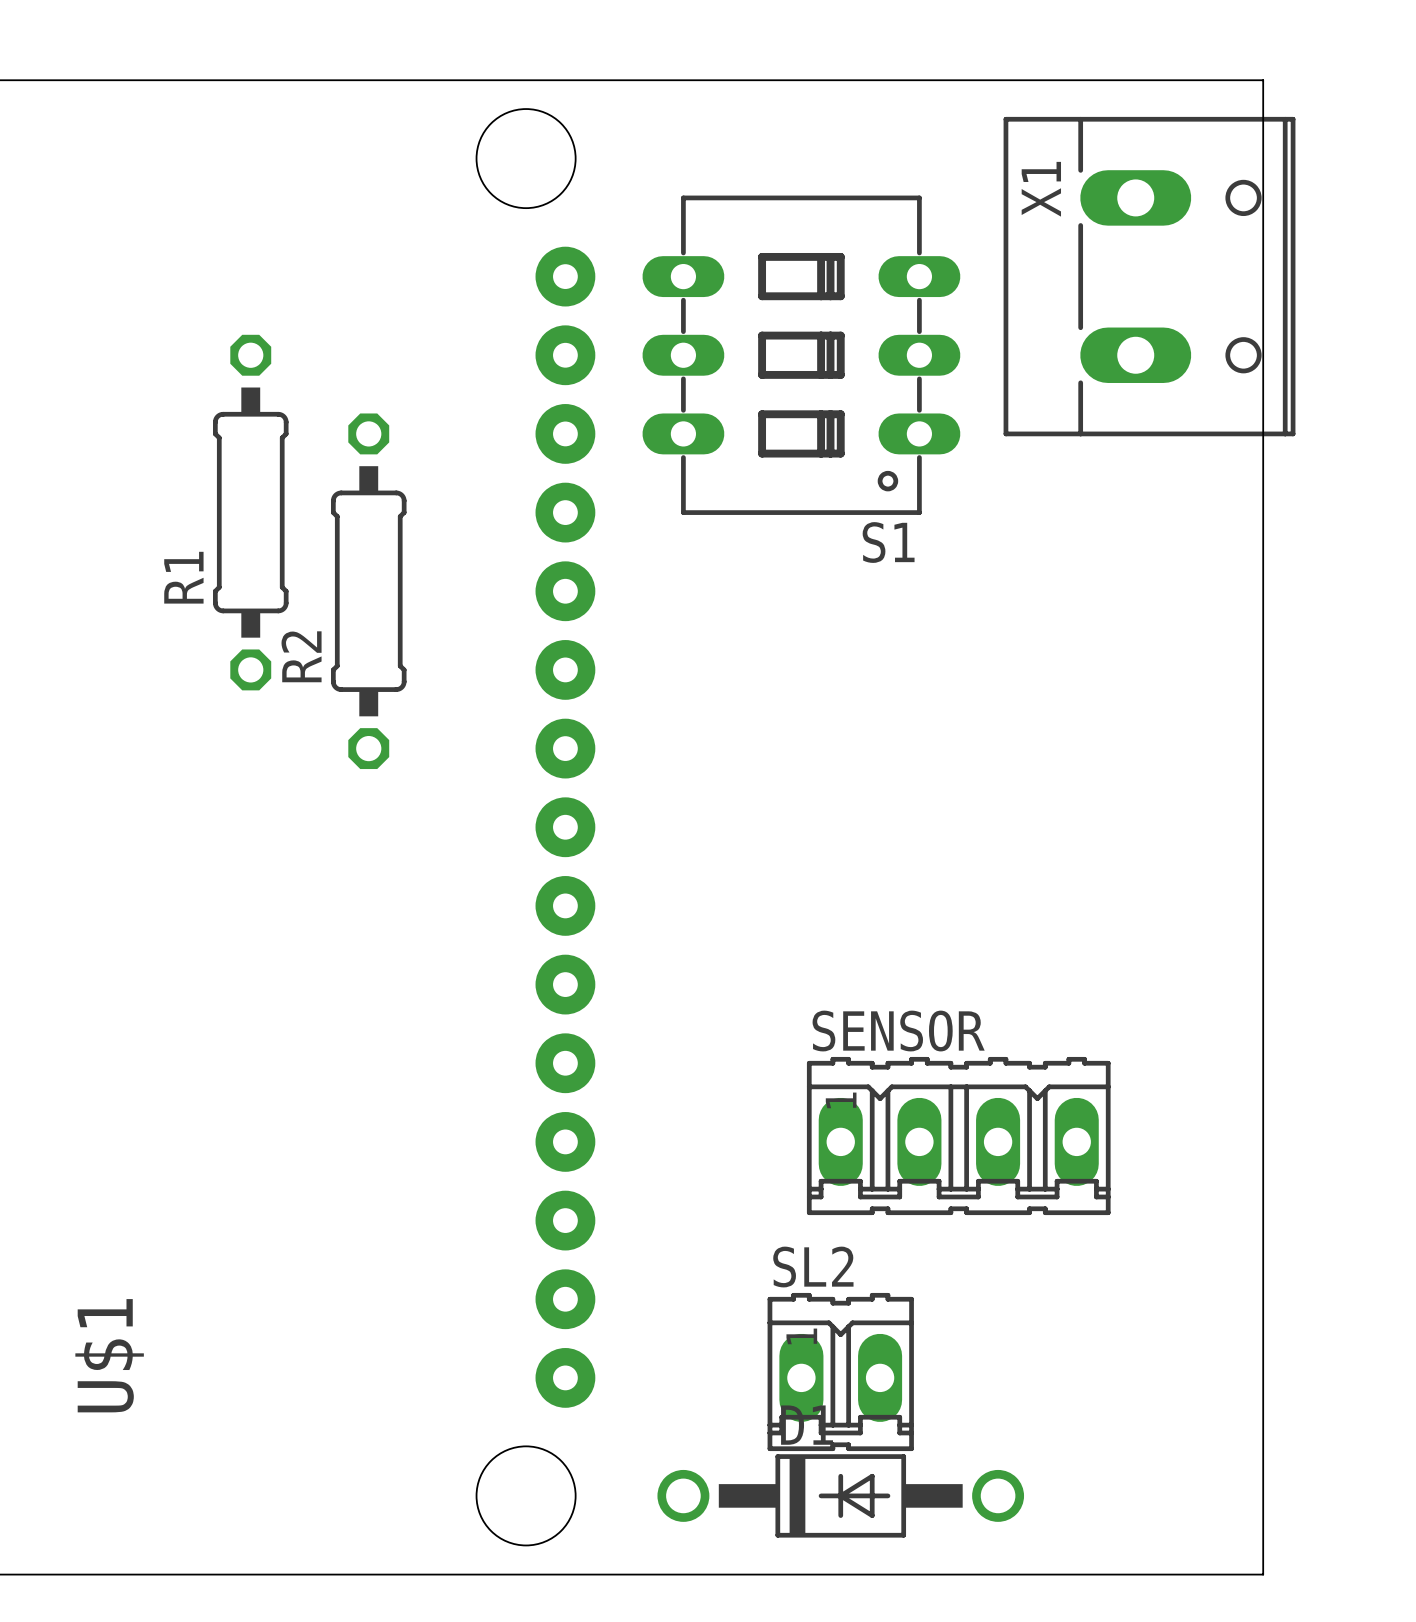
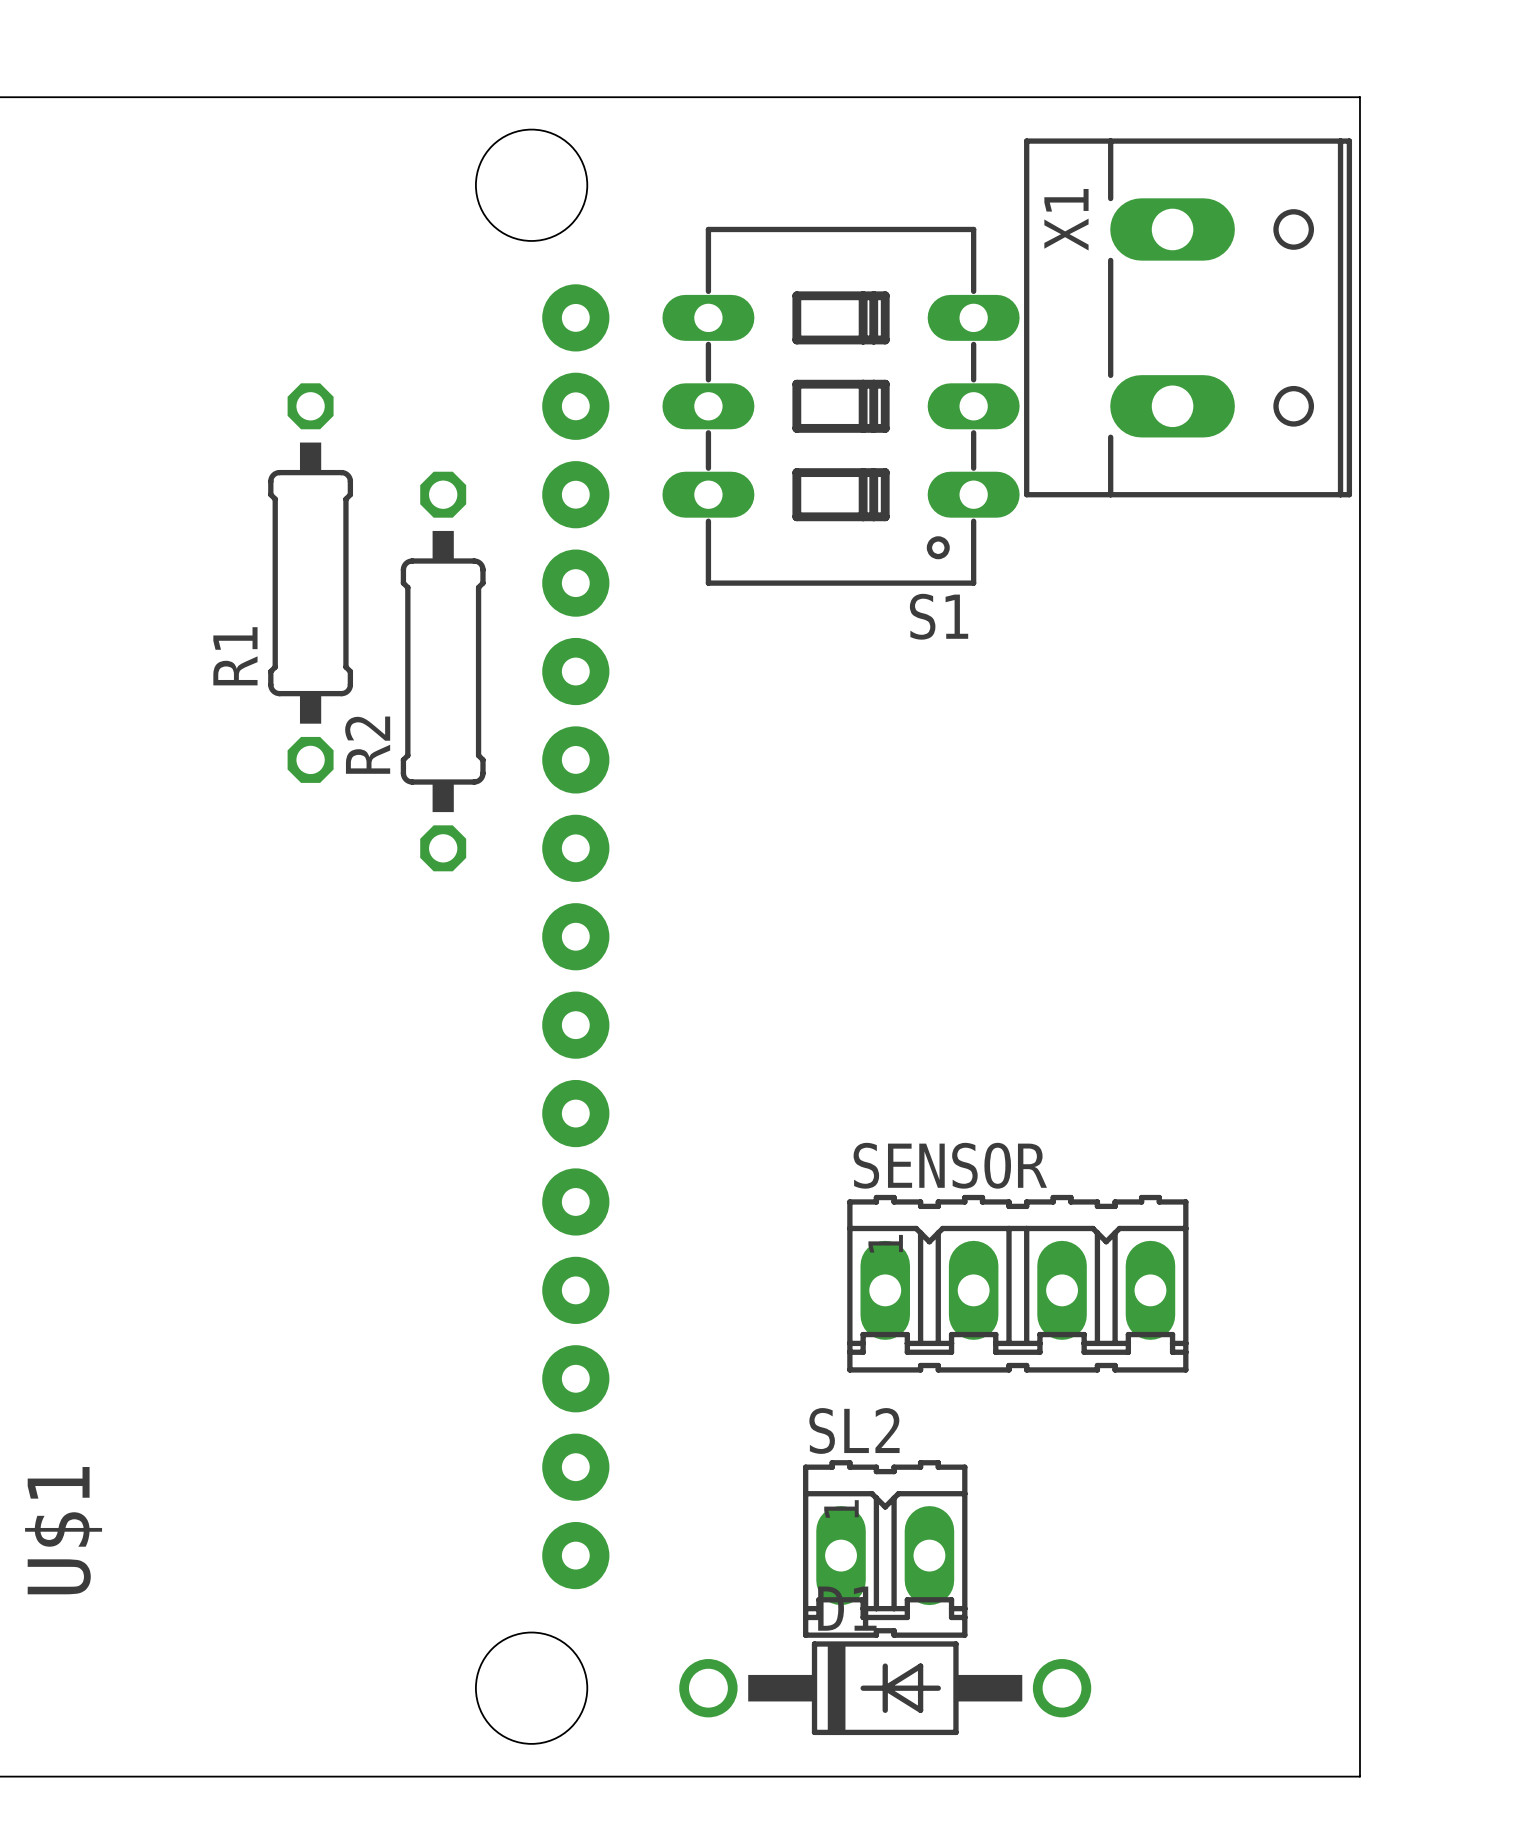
X1 position: (1149, 276) -> (1188, 317)
R1 position: (250, 512) -> (310, 583)
R2 position: (368, 591) -> (443, 671)

